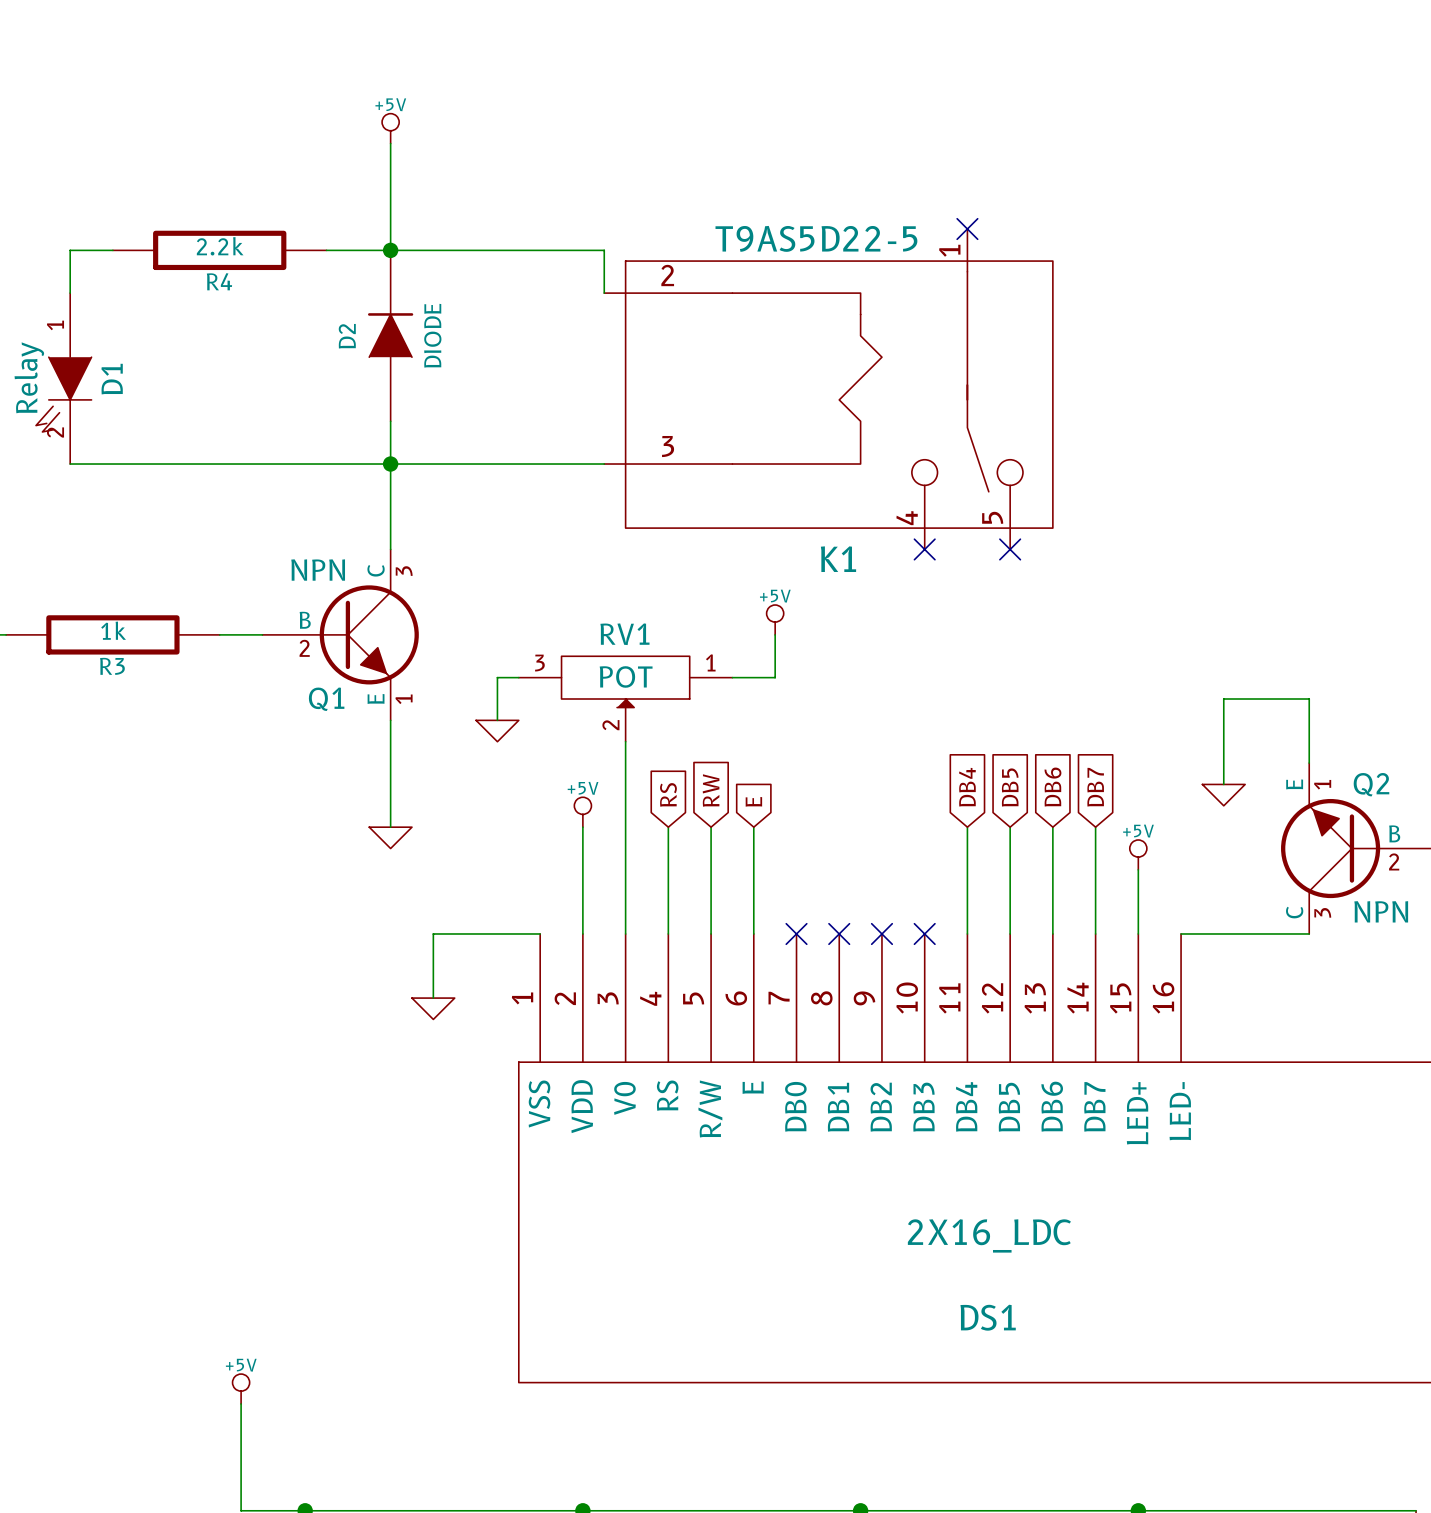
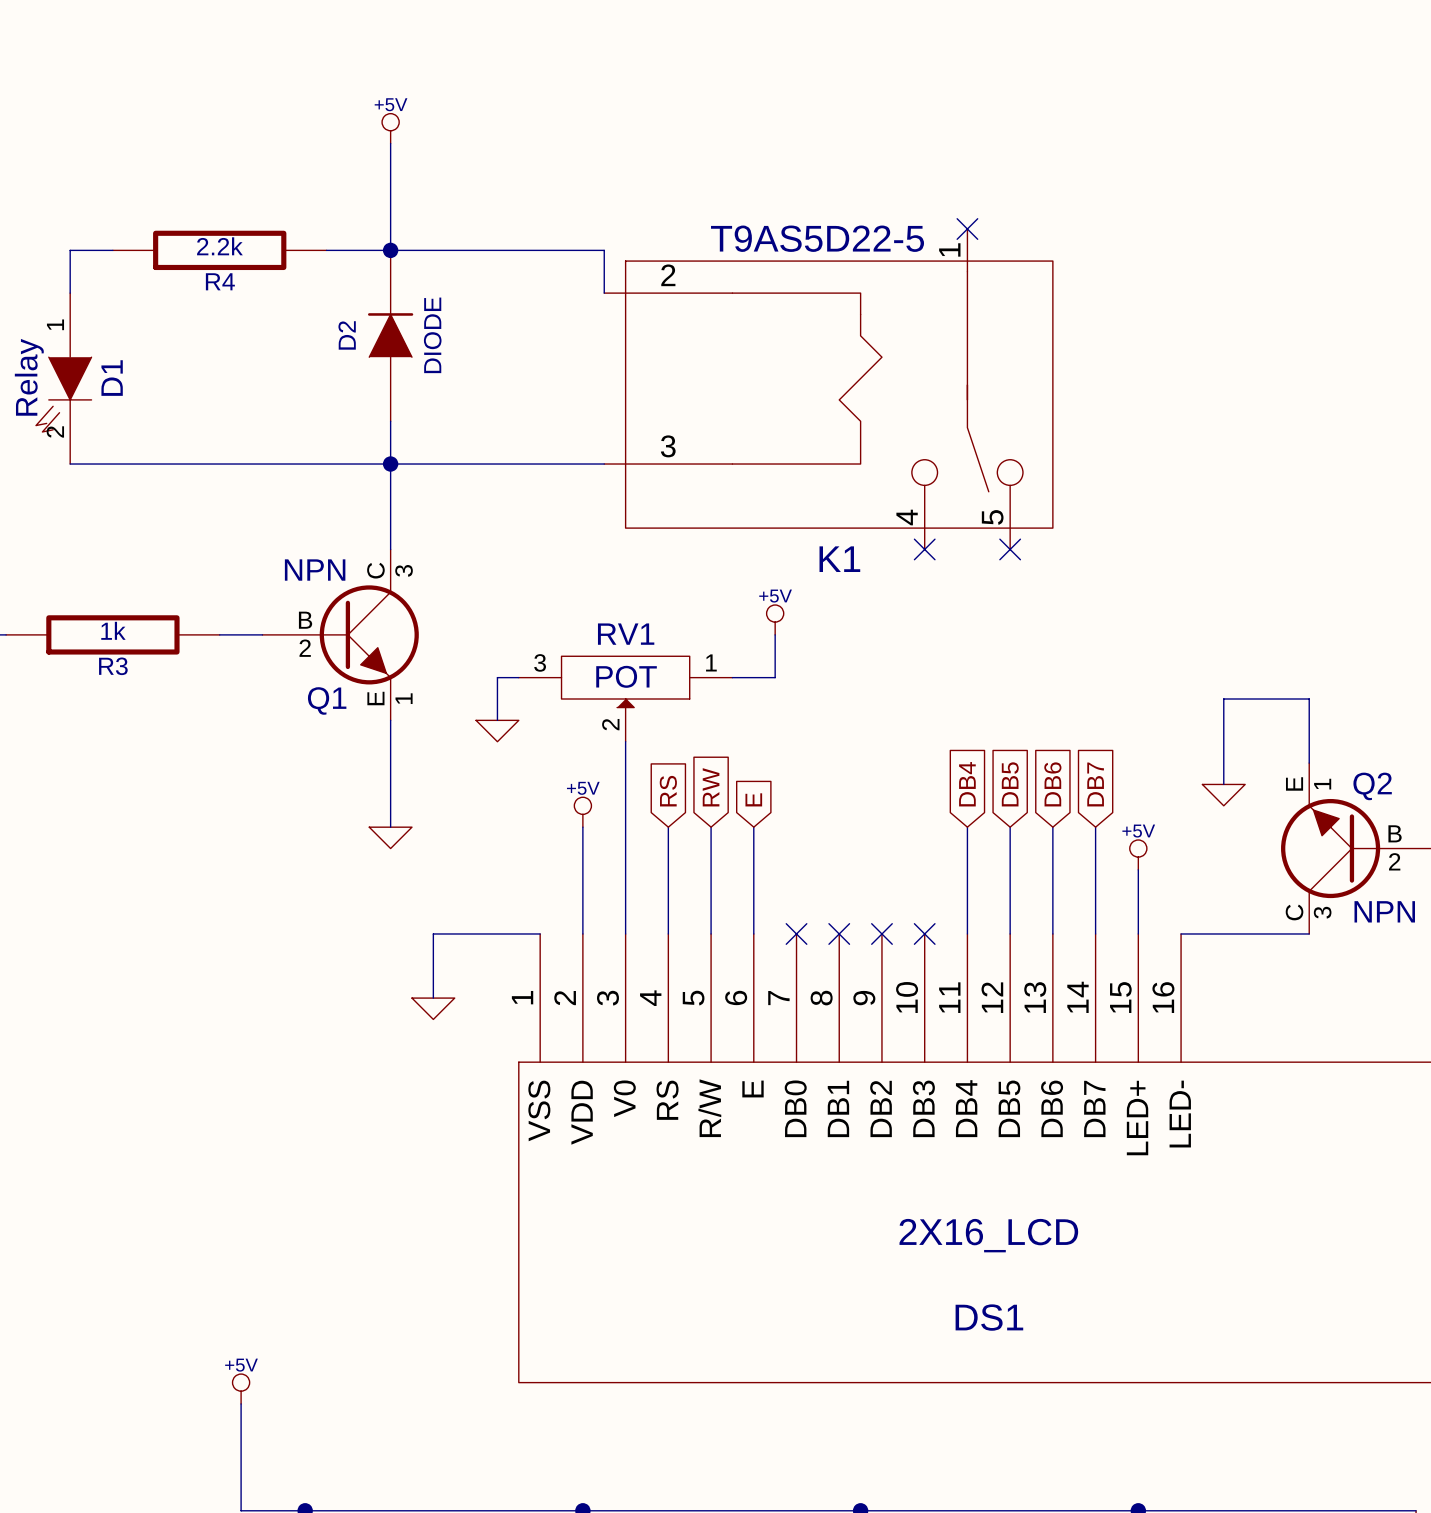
DS1 value: 2X16_LDC (989, 1235) -> 2X16_LCD (988, 1235)

